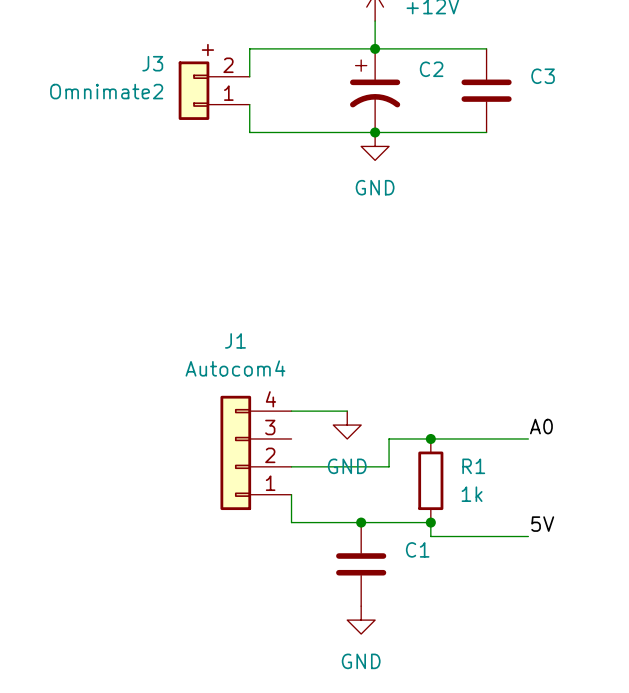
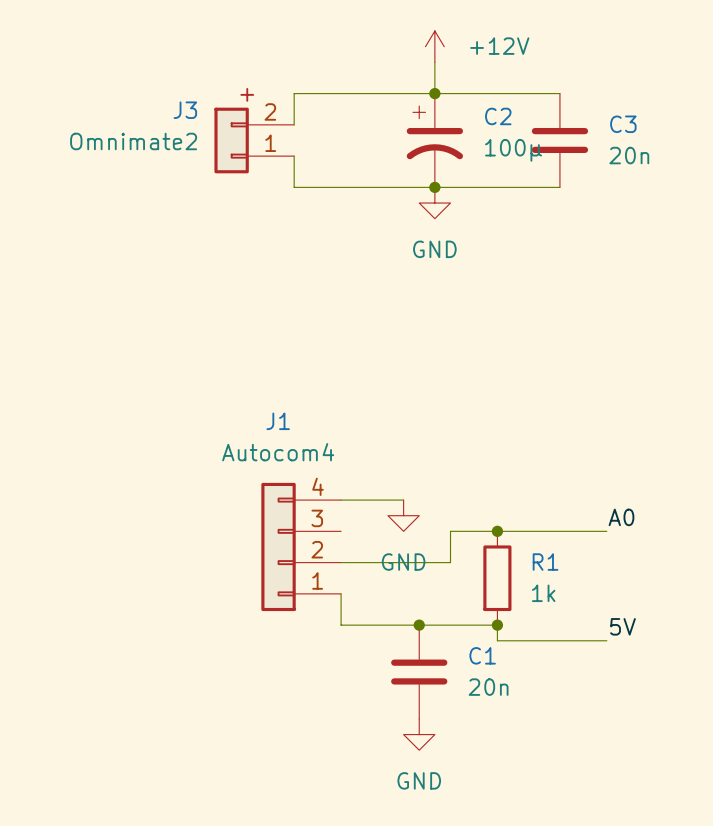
C2 value: none -> 100µ (513, 150)
C3 value: none -> 20n (629, 155)
C1 value: none -> 20n (488, 687)

